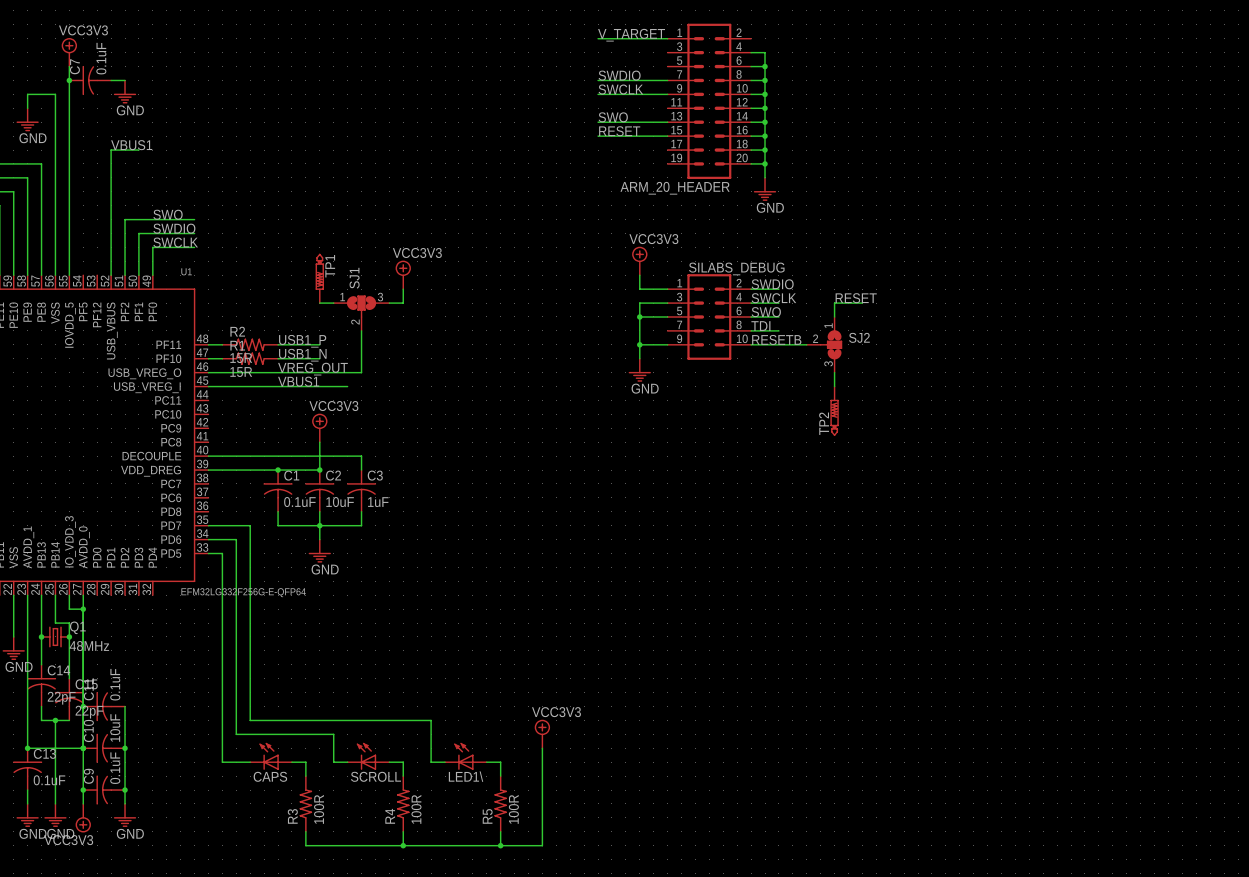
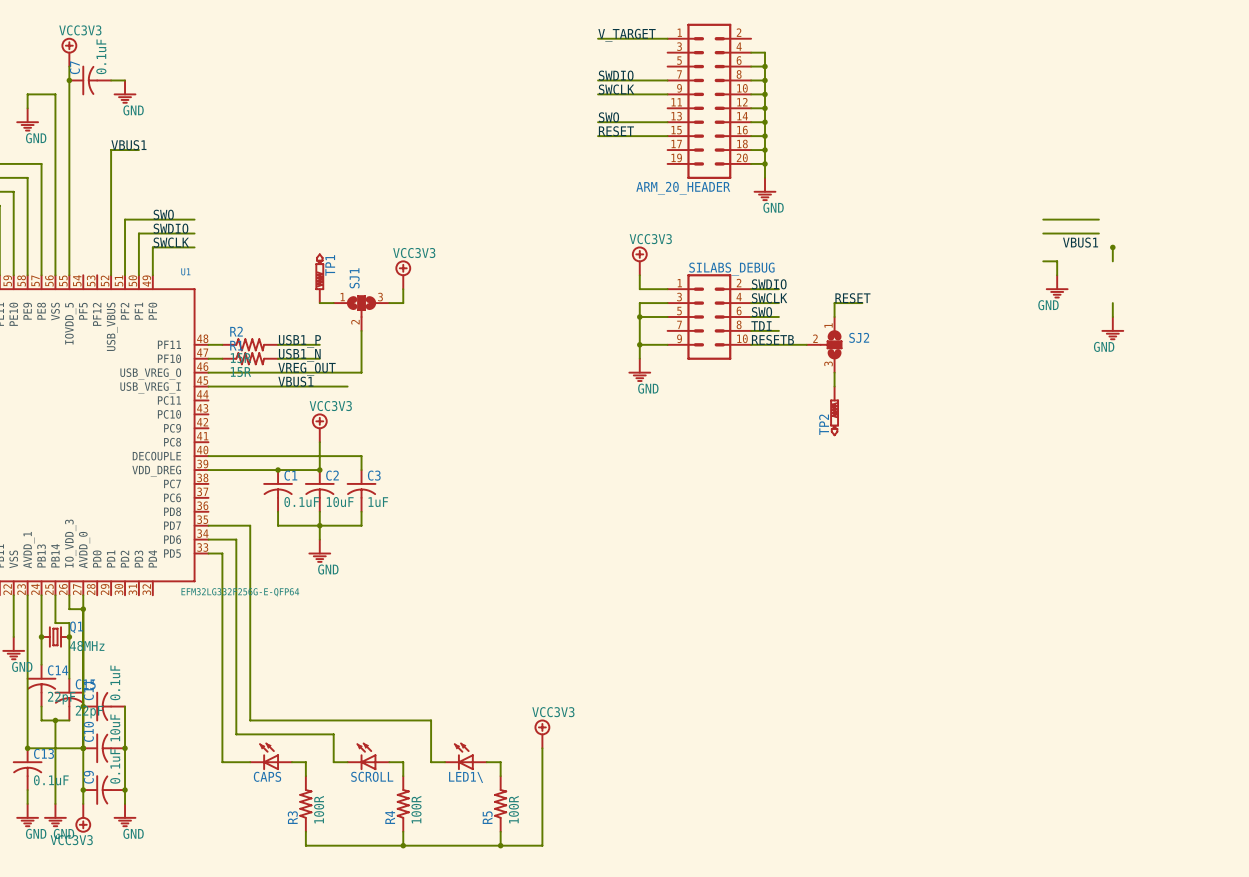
wire: none -> (1043, 219) (1098, 219)
wire: none -> (1043, 233) (1098, 233)
label: none -> VBUS1 (1080, 242)
wire: none -> (1112, 247) (1112, 261)
junction: none -> (1112, 247)
wire: none -> (1043, 261) (1057, 261) (1057, 275)
power symbol: none -> GND (1057, 286)
wire: none -> (1112, 303) (1112, 316)
power symbol: none -> GND (1112, 328)

